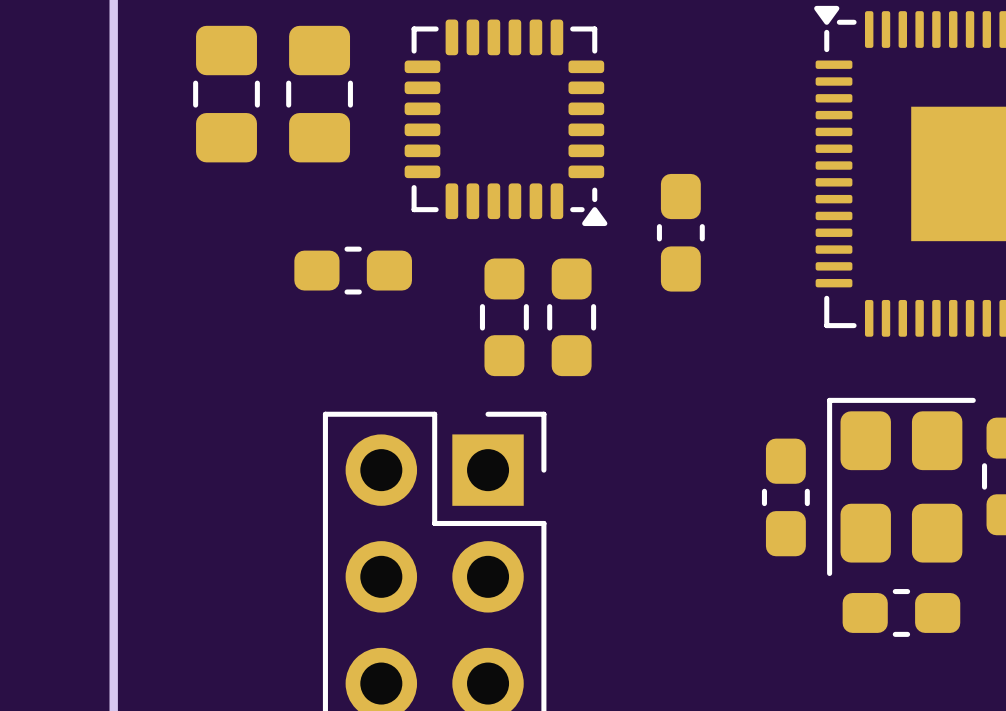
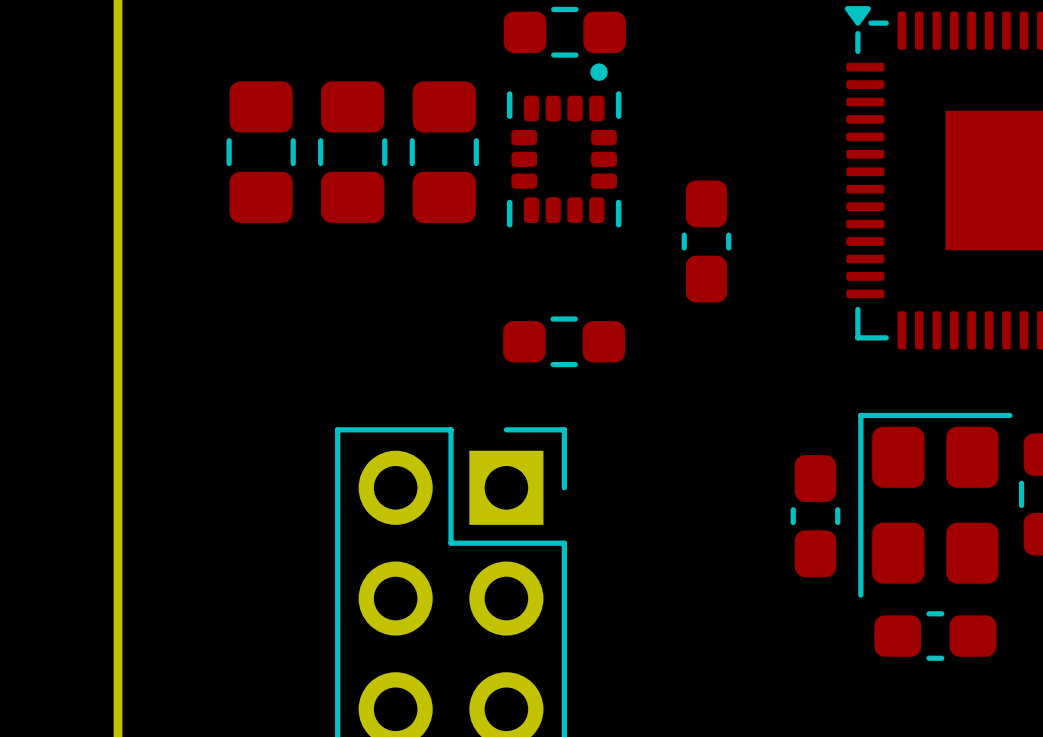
part: none -> (564, 32)
part: (226, 94) -> none
part: (319, 94) -> none
part: (505, 122) -> none
part: none -> (564, 145)
part: none -> (261, 152)
part: none -> (352, 152)
part: none -> (444, 152)
part: (353, 270) -> none
part: (504, 317) -> none
part: (571, 317) -> none
part: none -> (564, 341)

